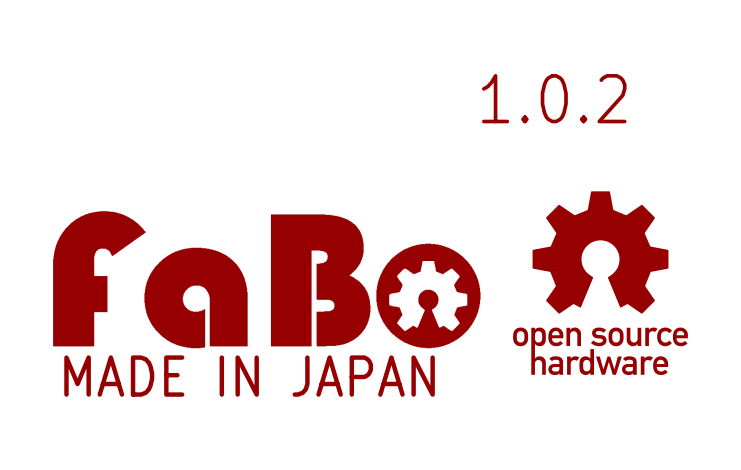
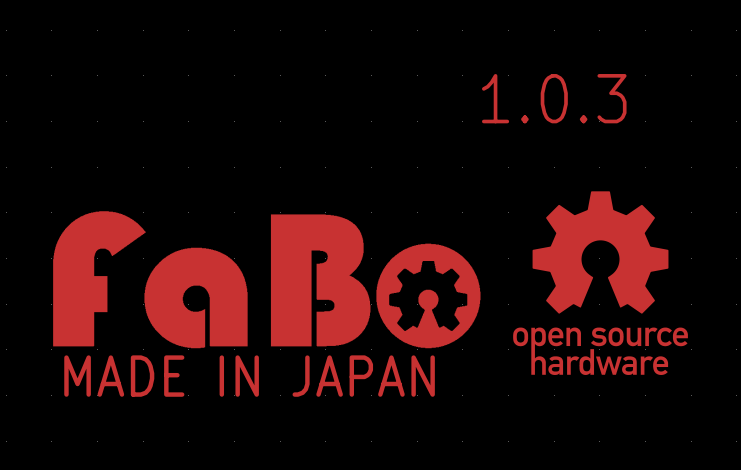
text: 1.0.2 (554, 98) -> 1.0.3 (554, 98)

